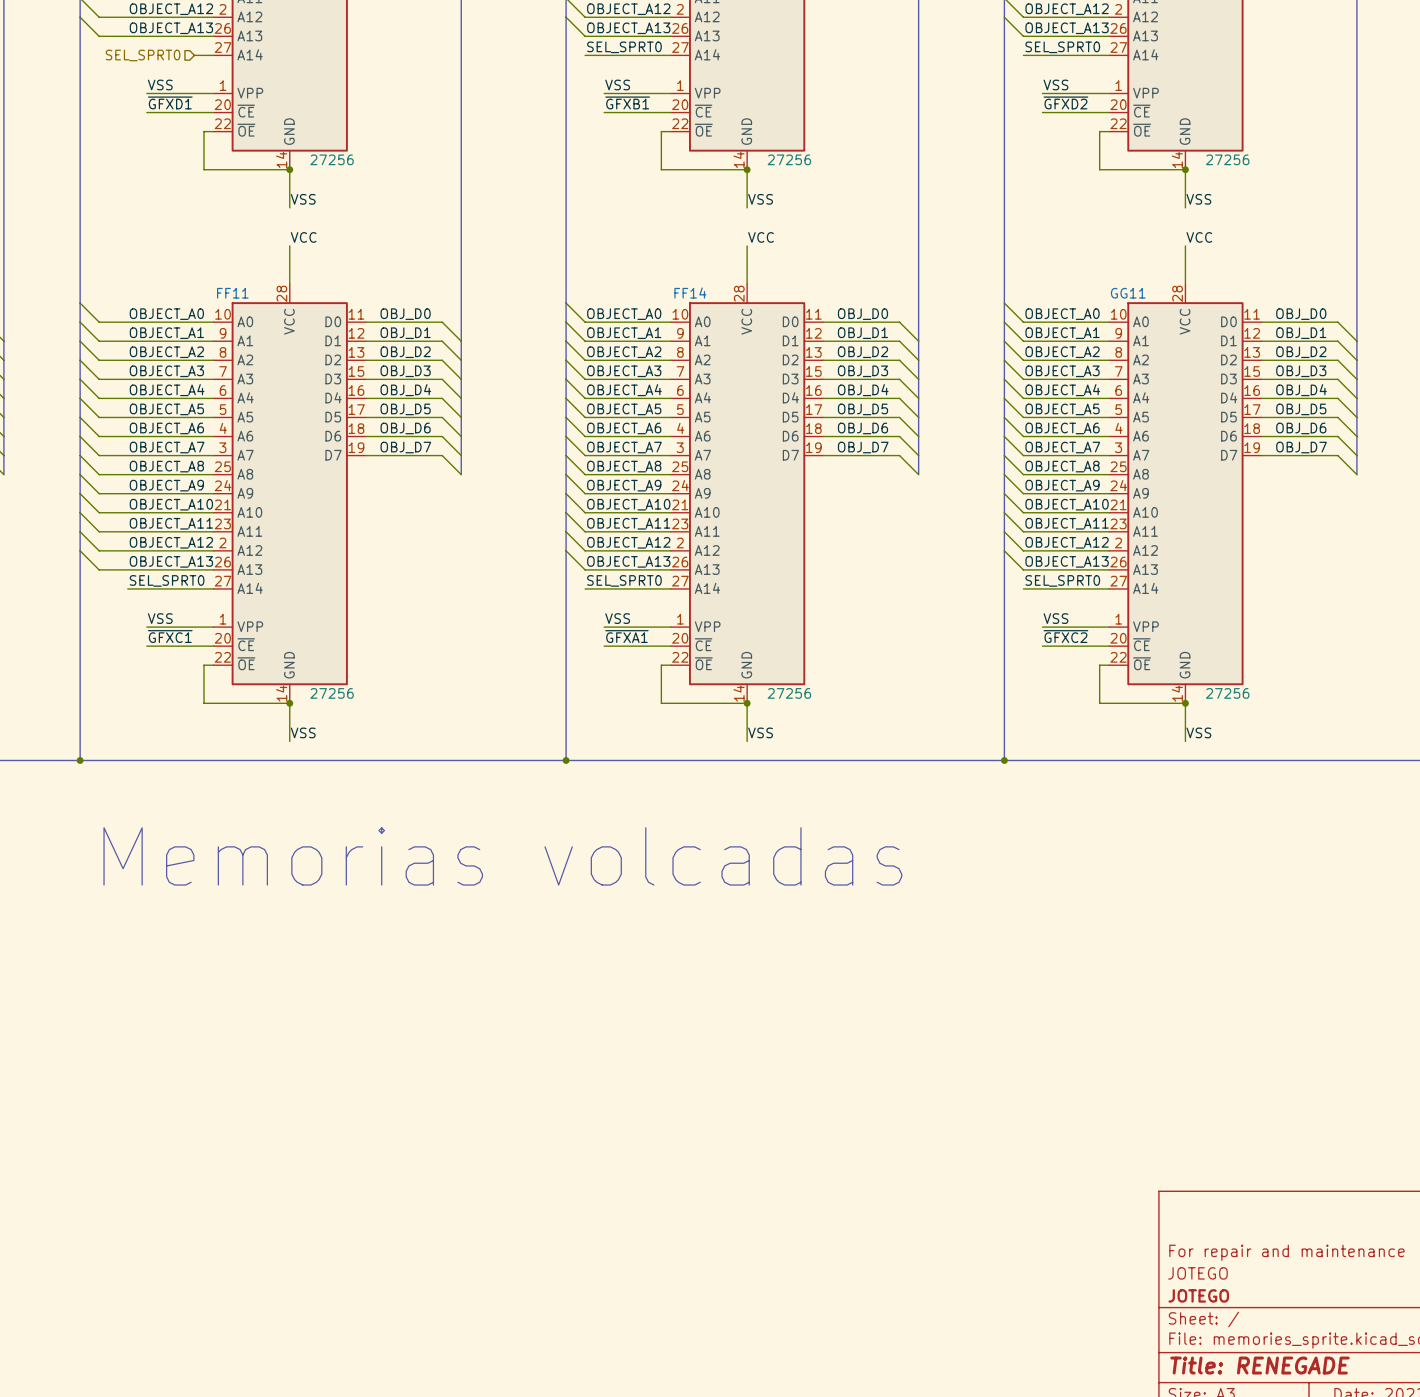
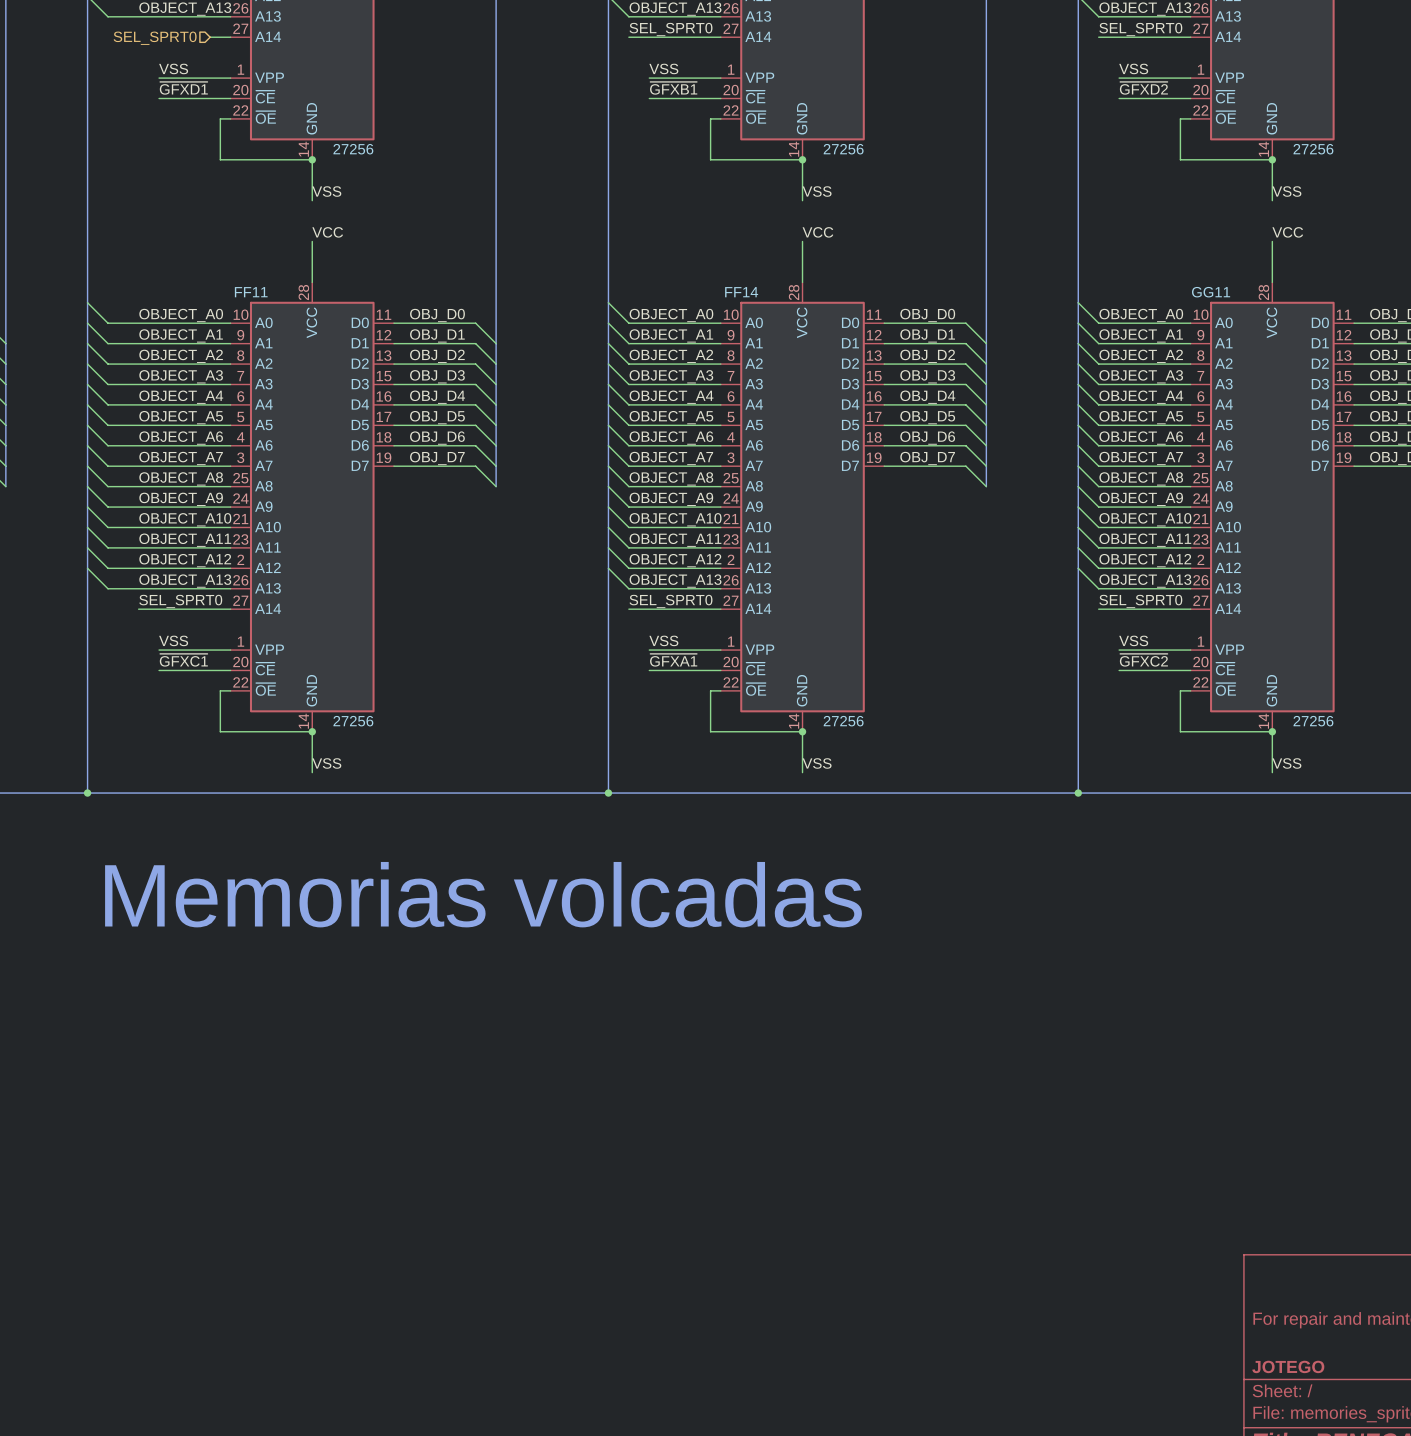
title block: JOTEGO (1198, 1273) -> none

